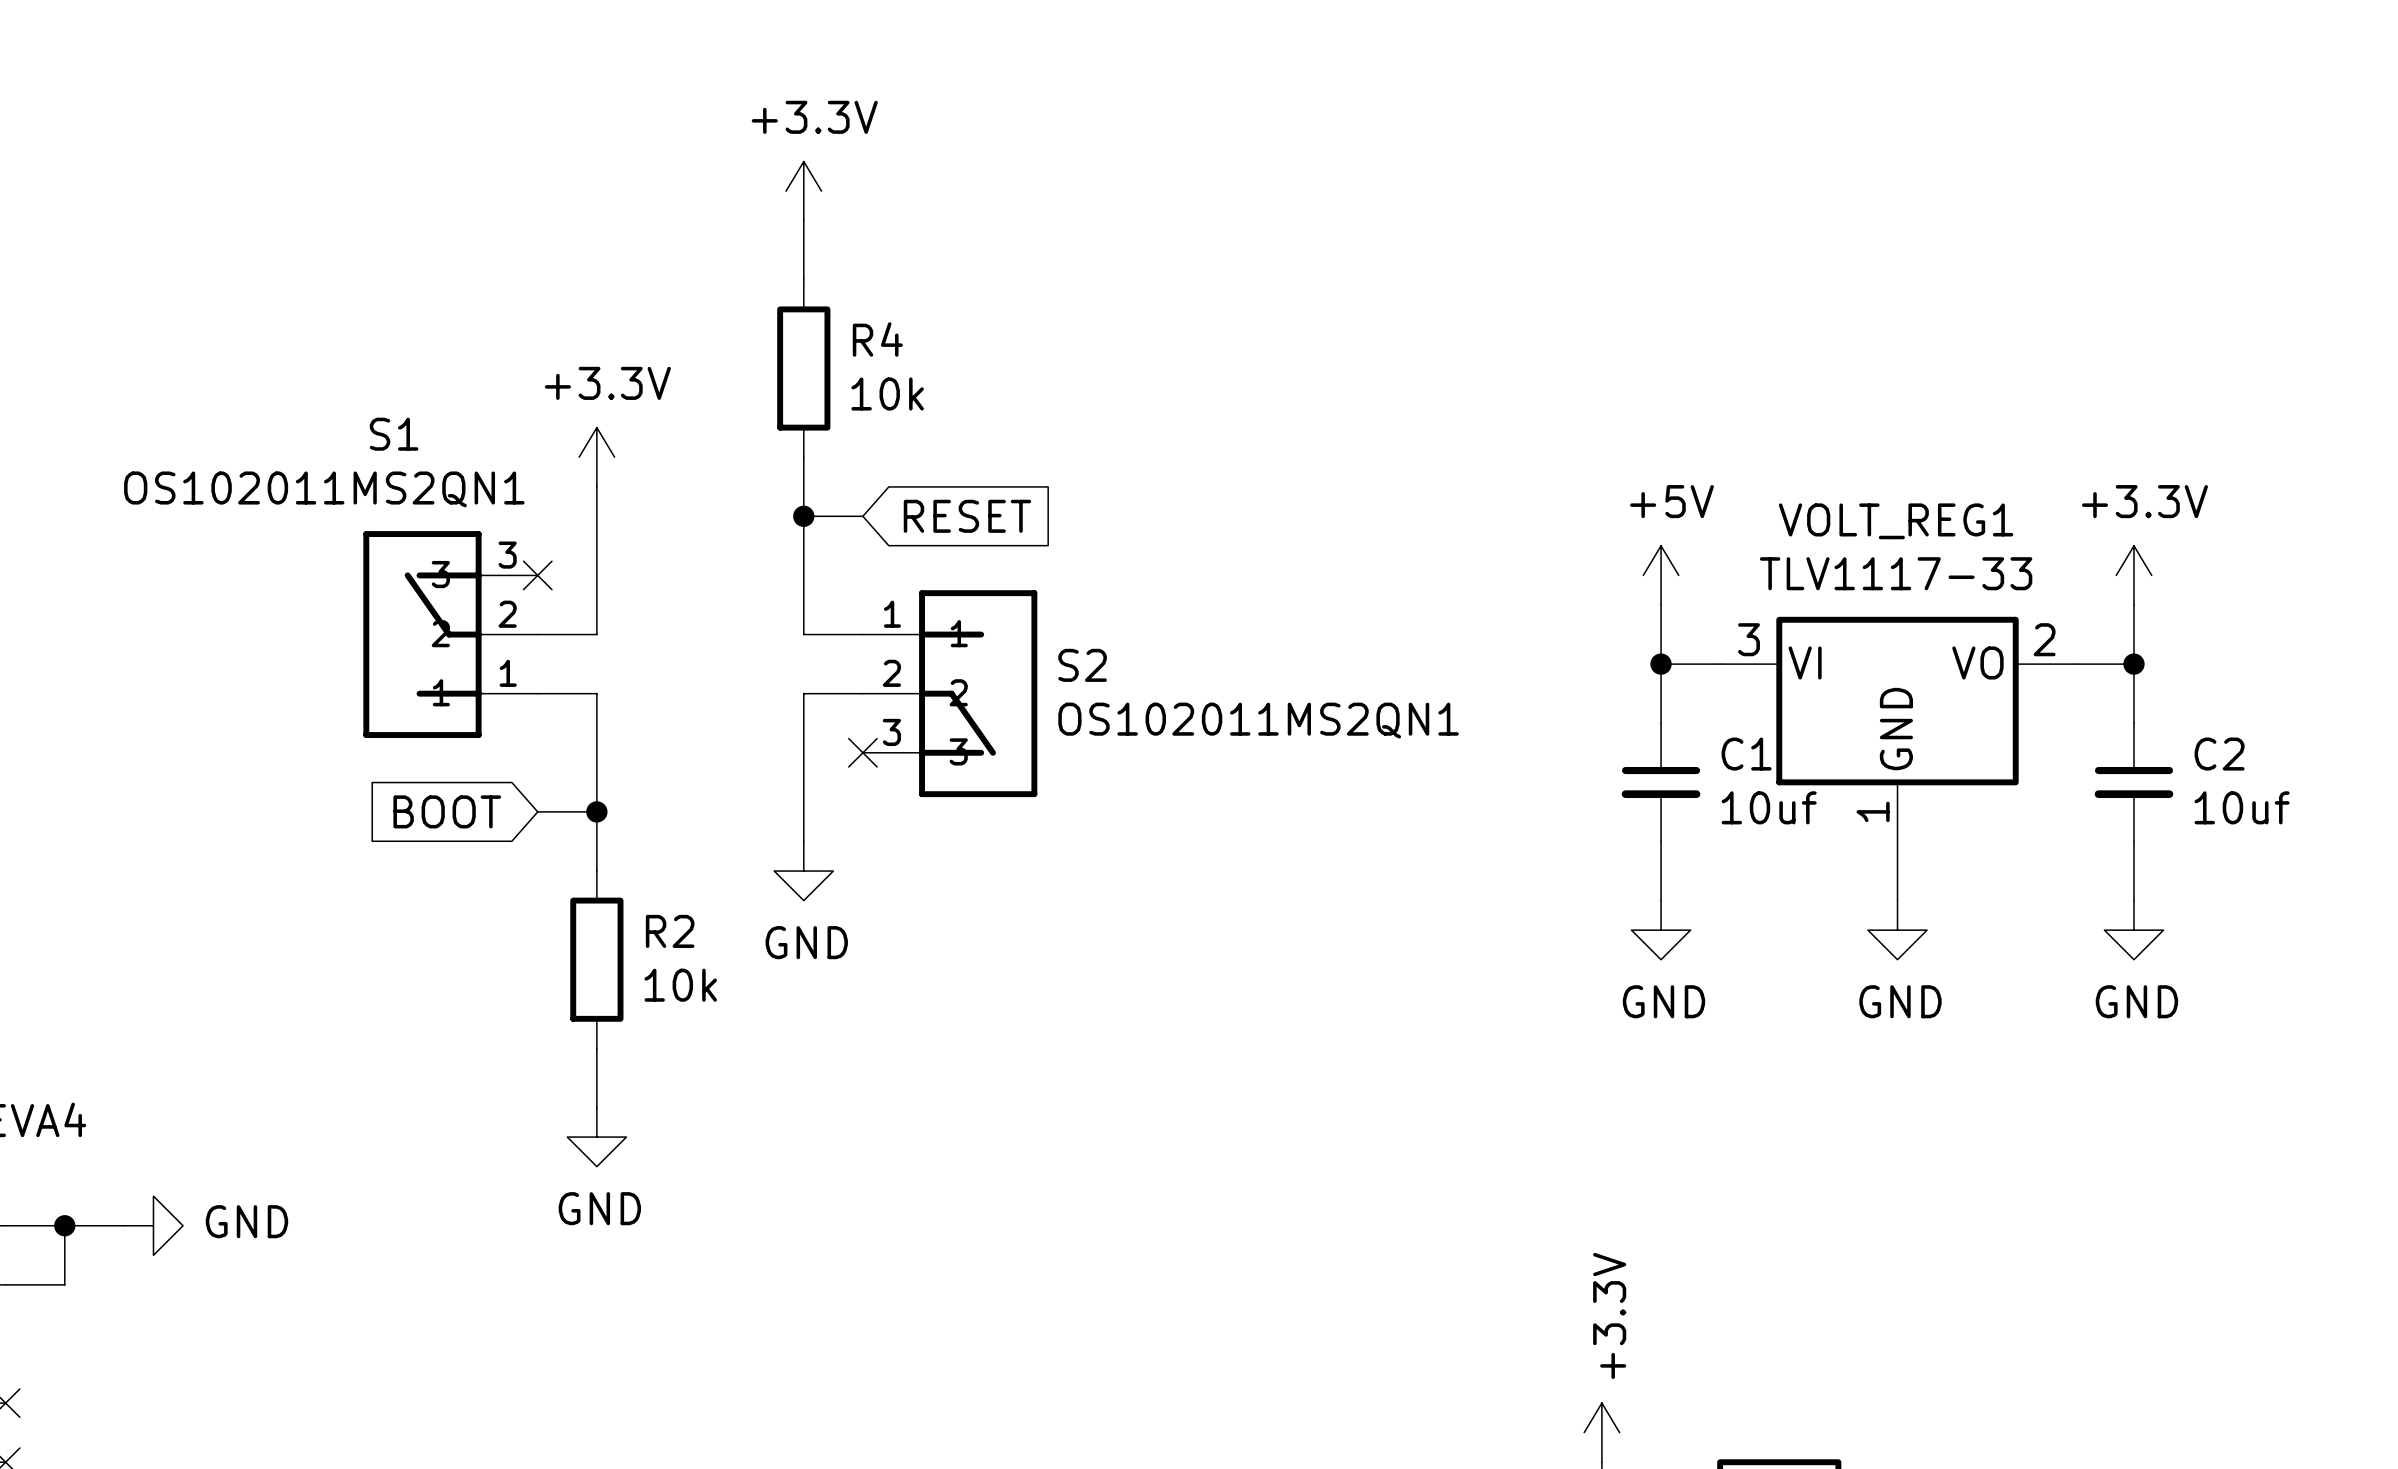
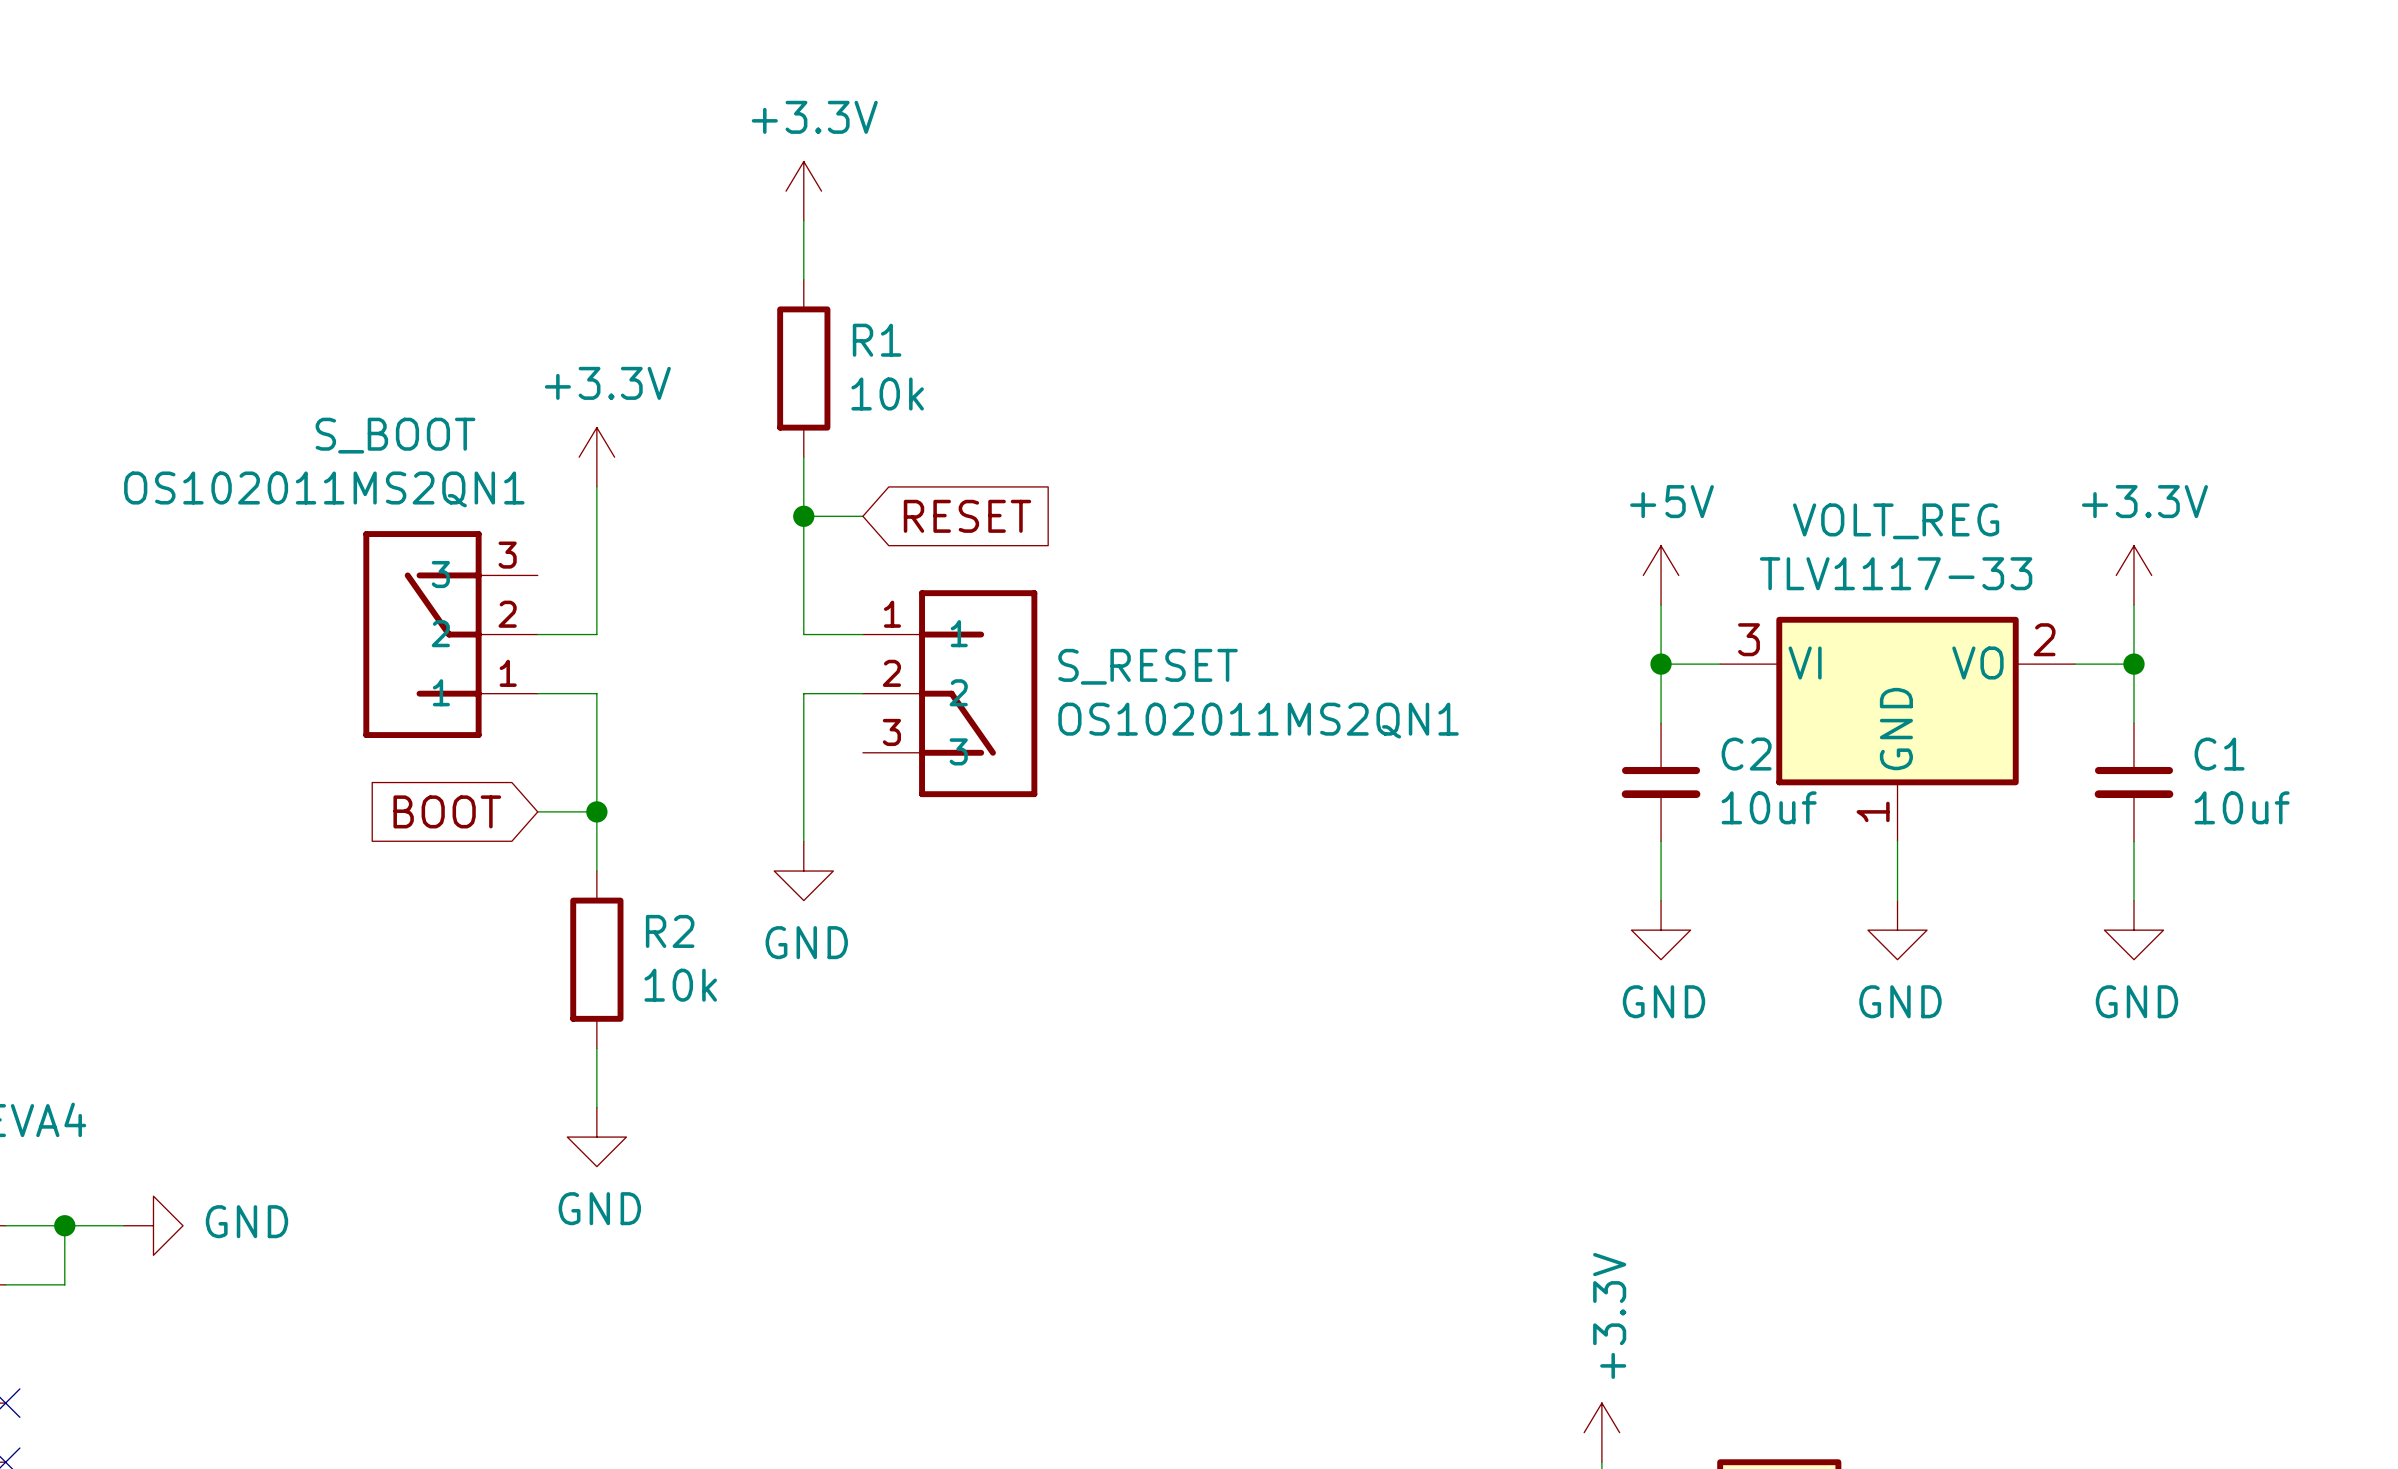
R4 name: R4 (877, 339) -> R1 (877, 340)
S1 name: S1 (394, 434) -> S_BOOT (395, 435)
VOLT_REG1 name: VOLT_REG1 (1896, 521) -> VOLT_REG (1896, 521)
no-connect mark: (537, 575) -> none
S2 name: S2 (1082, 665) -> S_RESET (1148, 666)
no-connect mark: (862, 752) -> none
C1 name: C1 (1746, 754) -> C2 (1746, 754)
C2 name: C2 (2219, 754) -> C1 (2219, 754)

